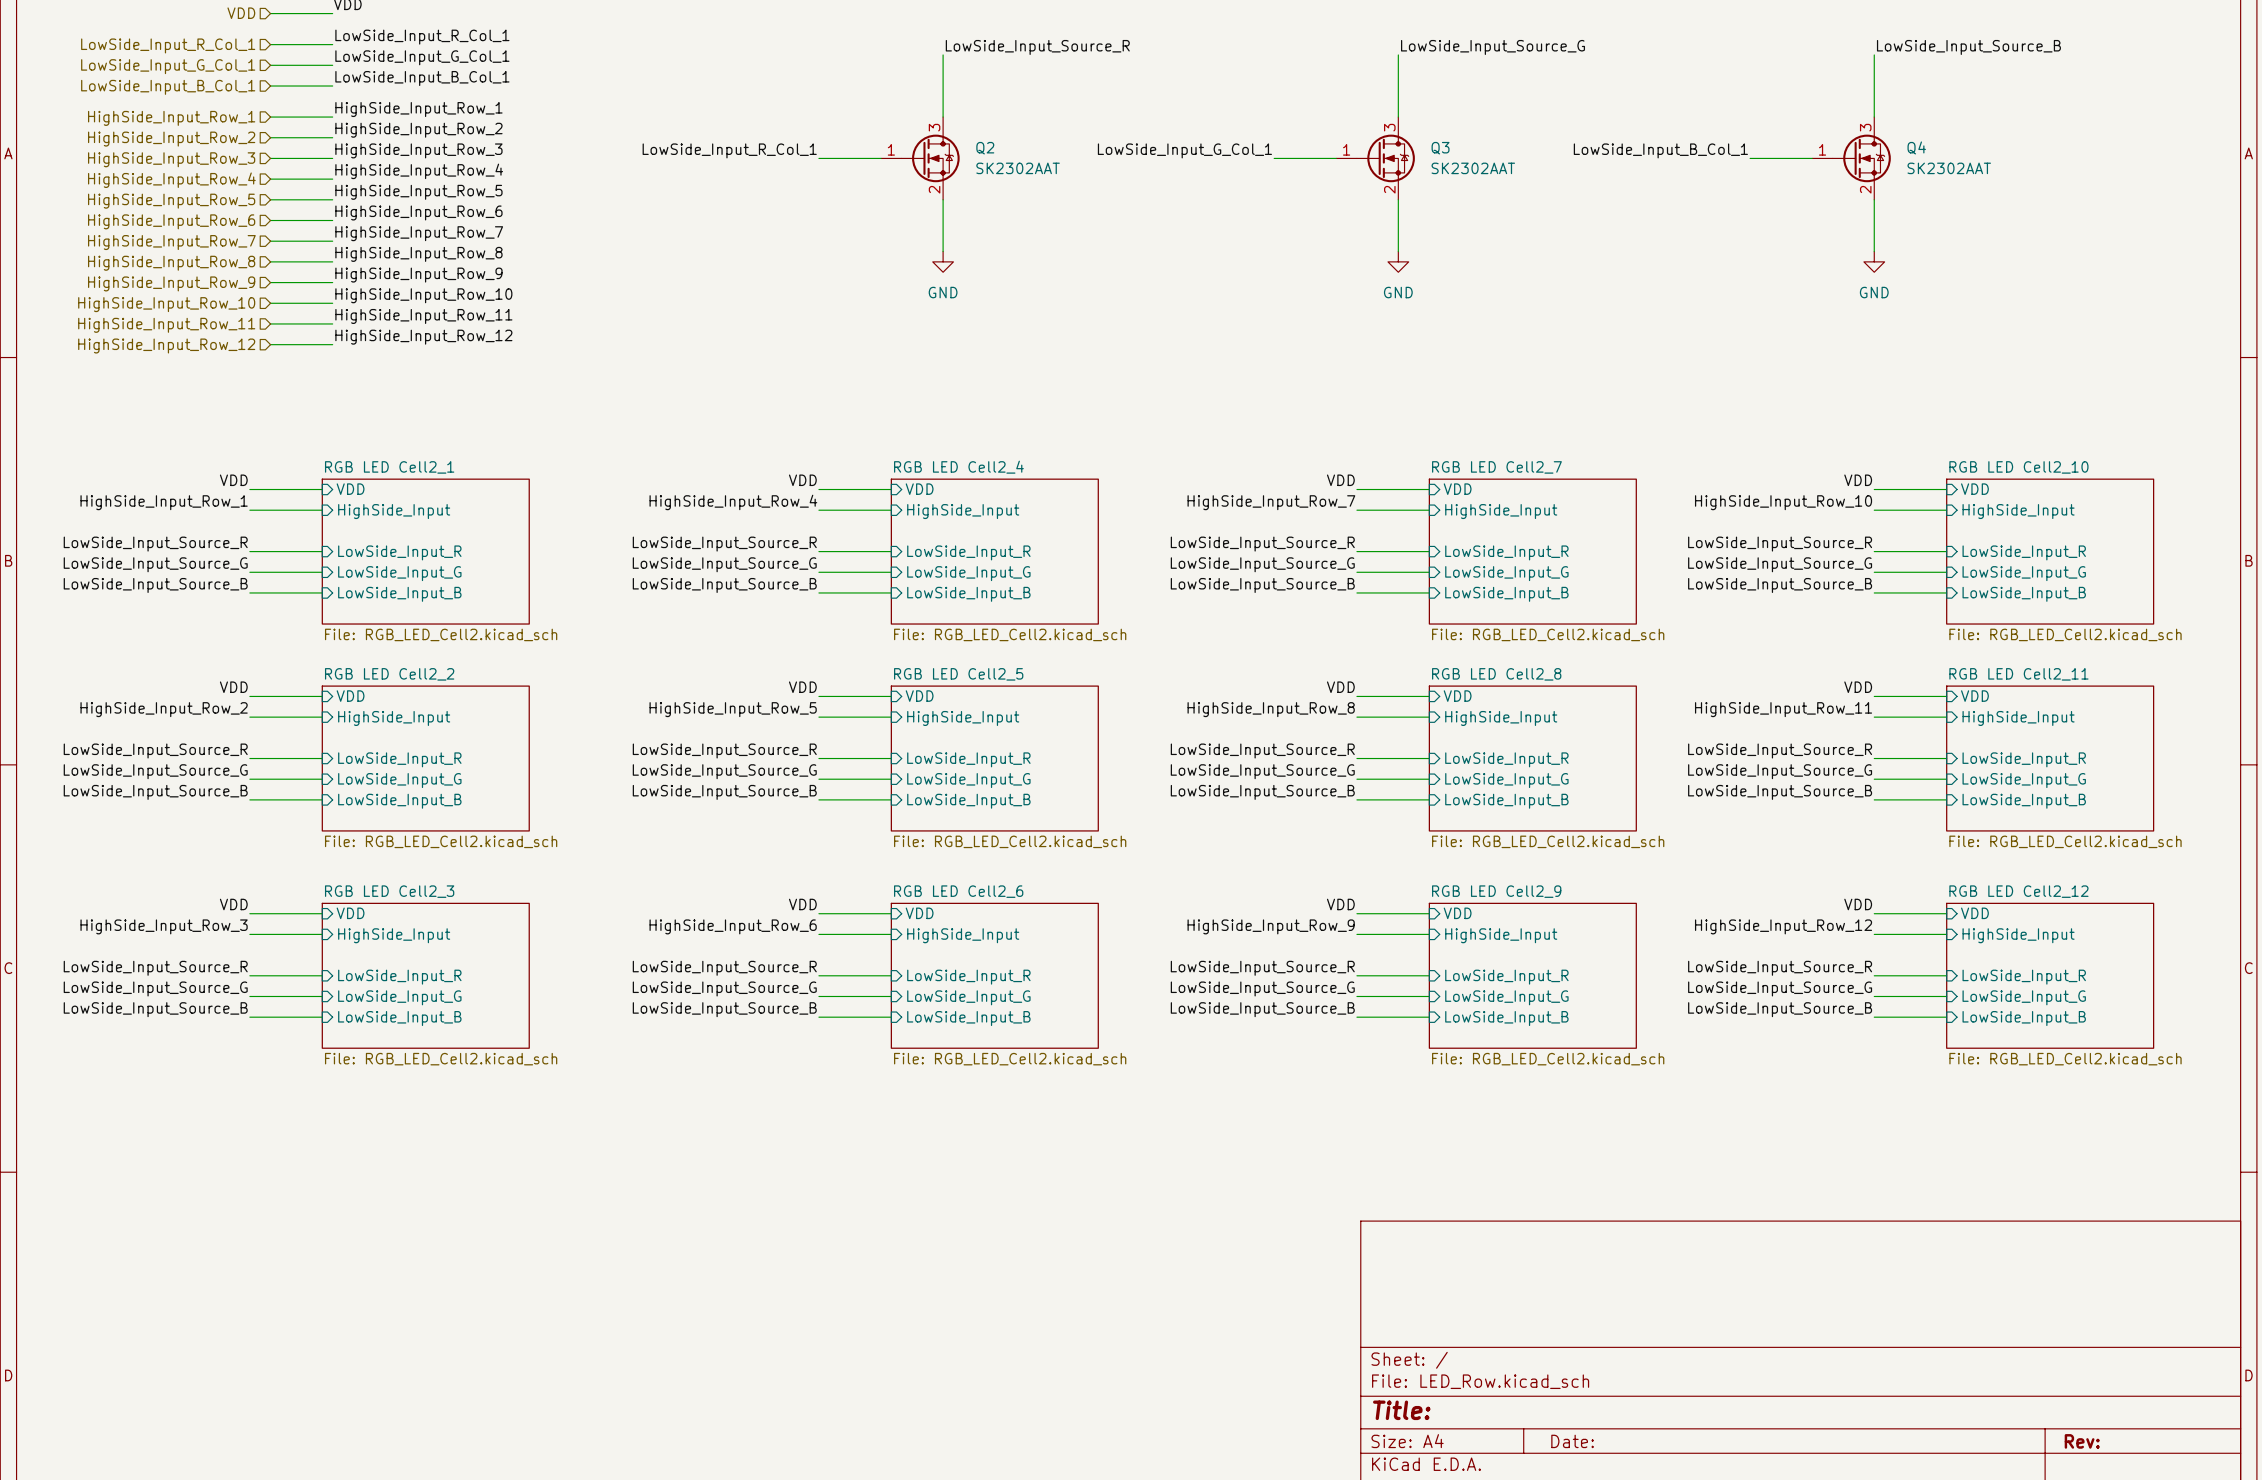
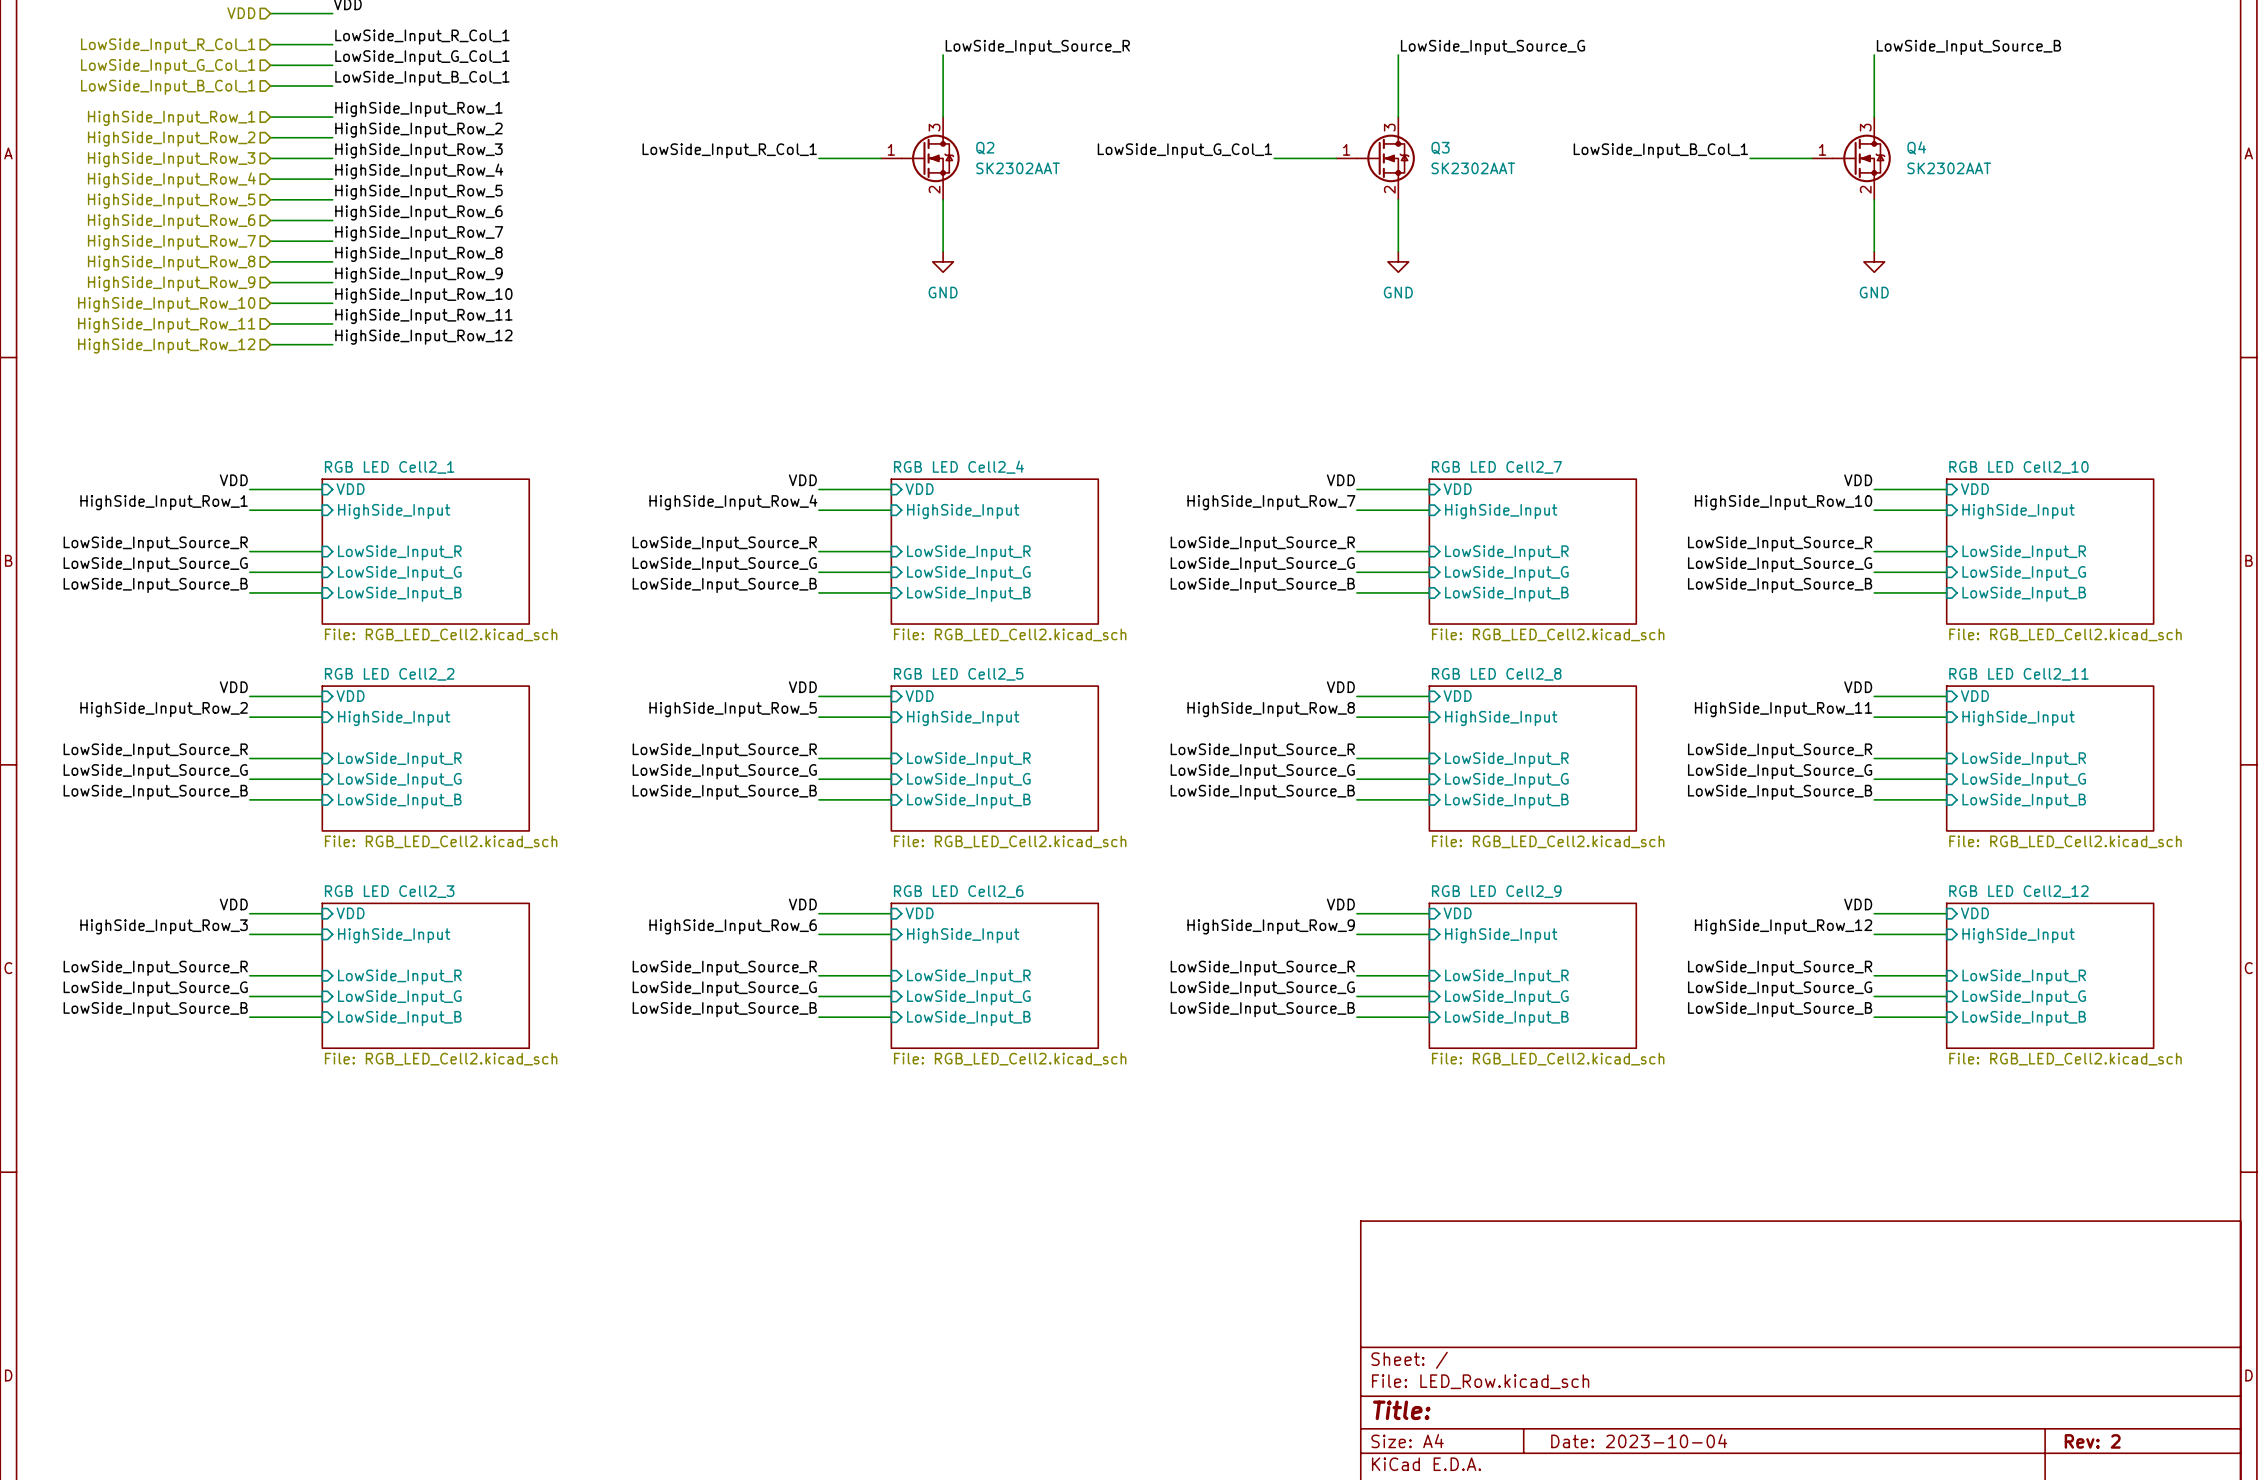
title block: Date: (1572, 1441) -> Date: 2023-10-04 (1639, 1441)
title block: Rev: (2082, 1441) -> Rev: 2 (2092, 1441)

